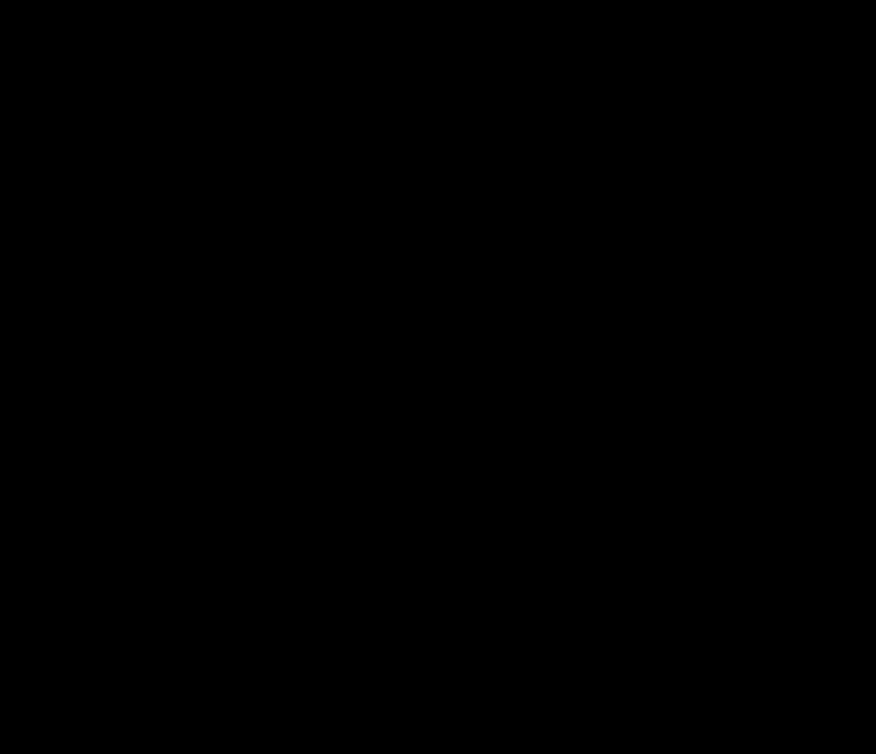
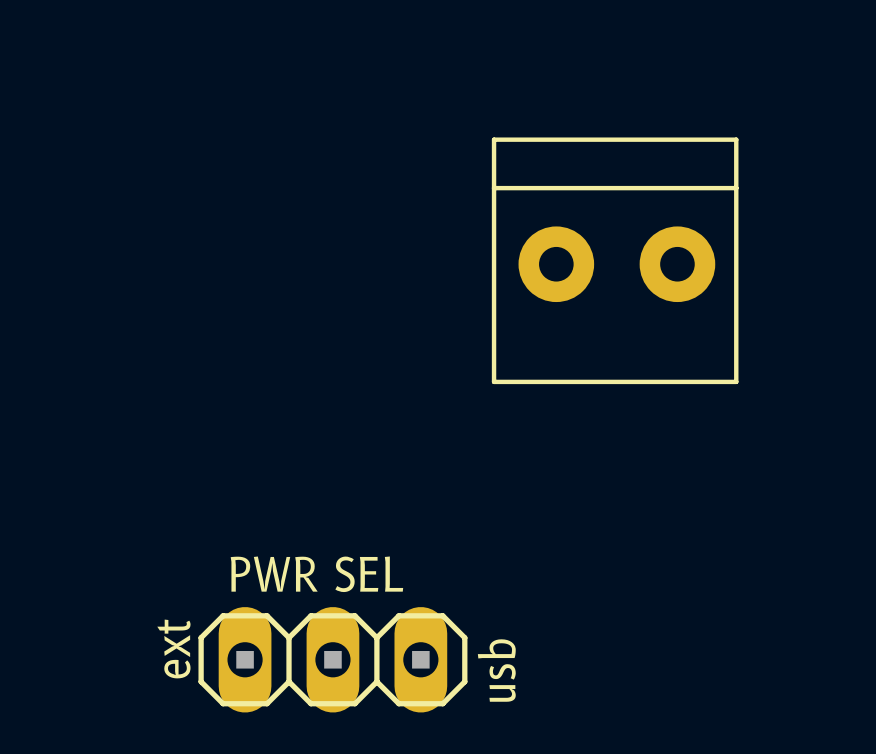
part: none -> (615, 260)
text: none -> PWR SEL (316, 574)
text: none -> ext (173, 648)
part: none -> (332, 659)
text: none -> usb (496, 670)

